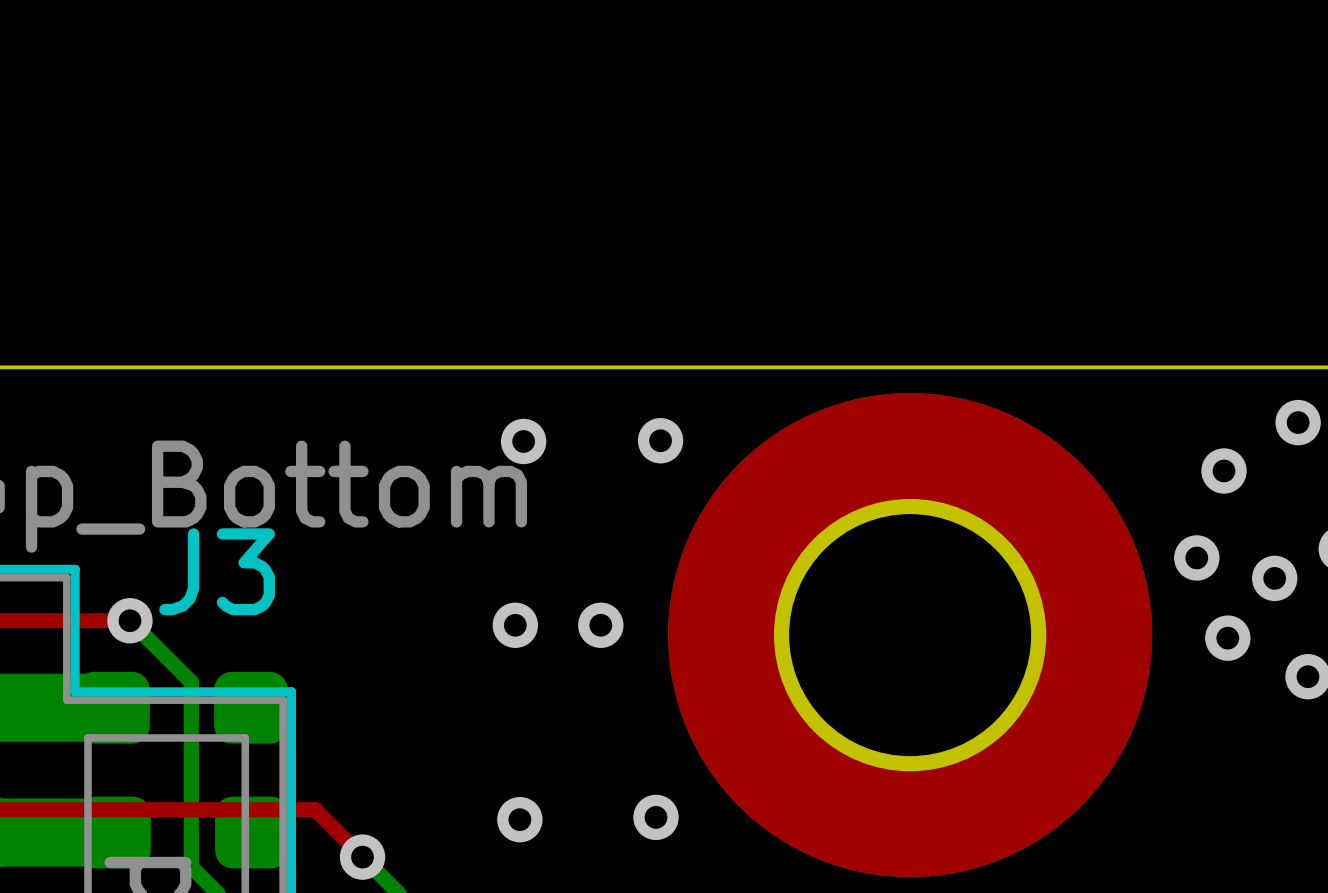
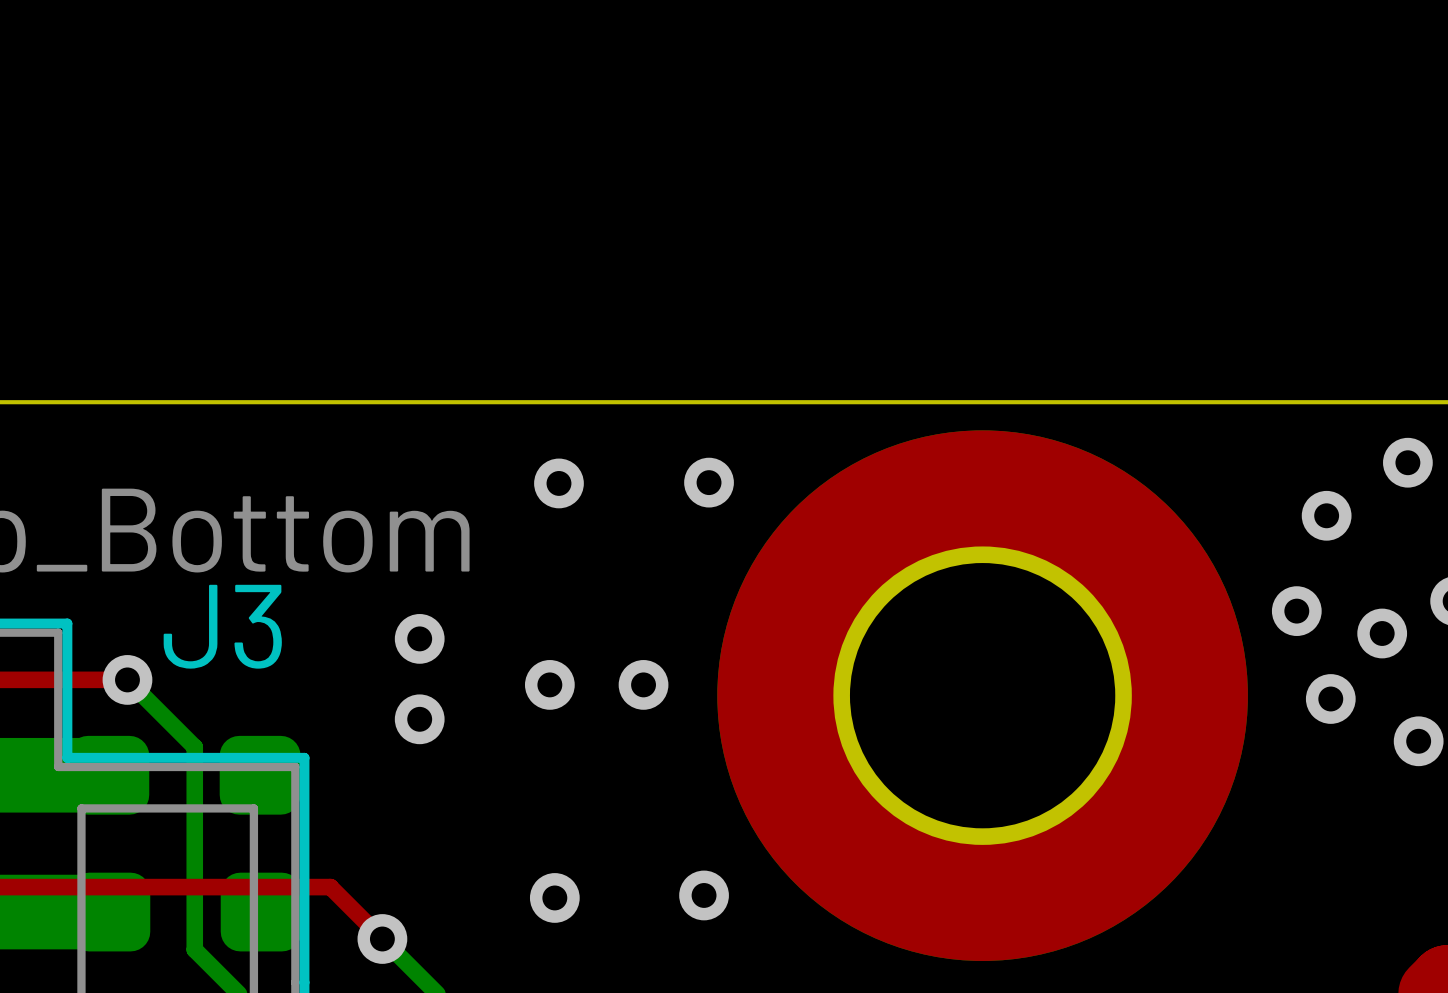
via: none -> (419, 638)
via: none -> (419, 719)

